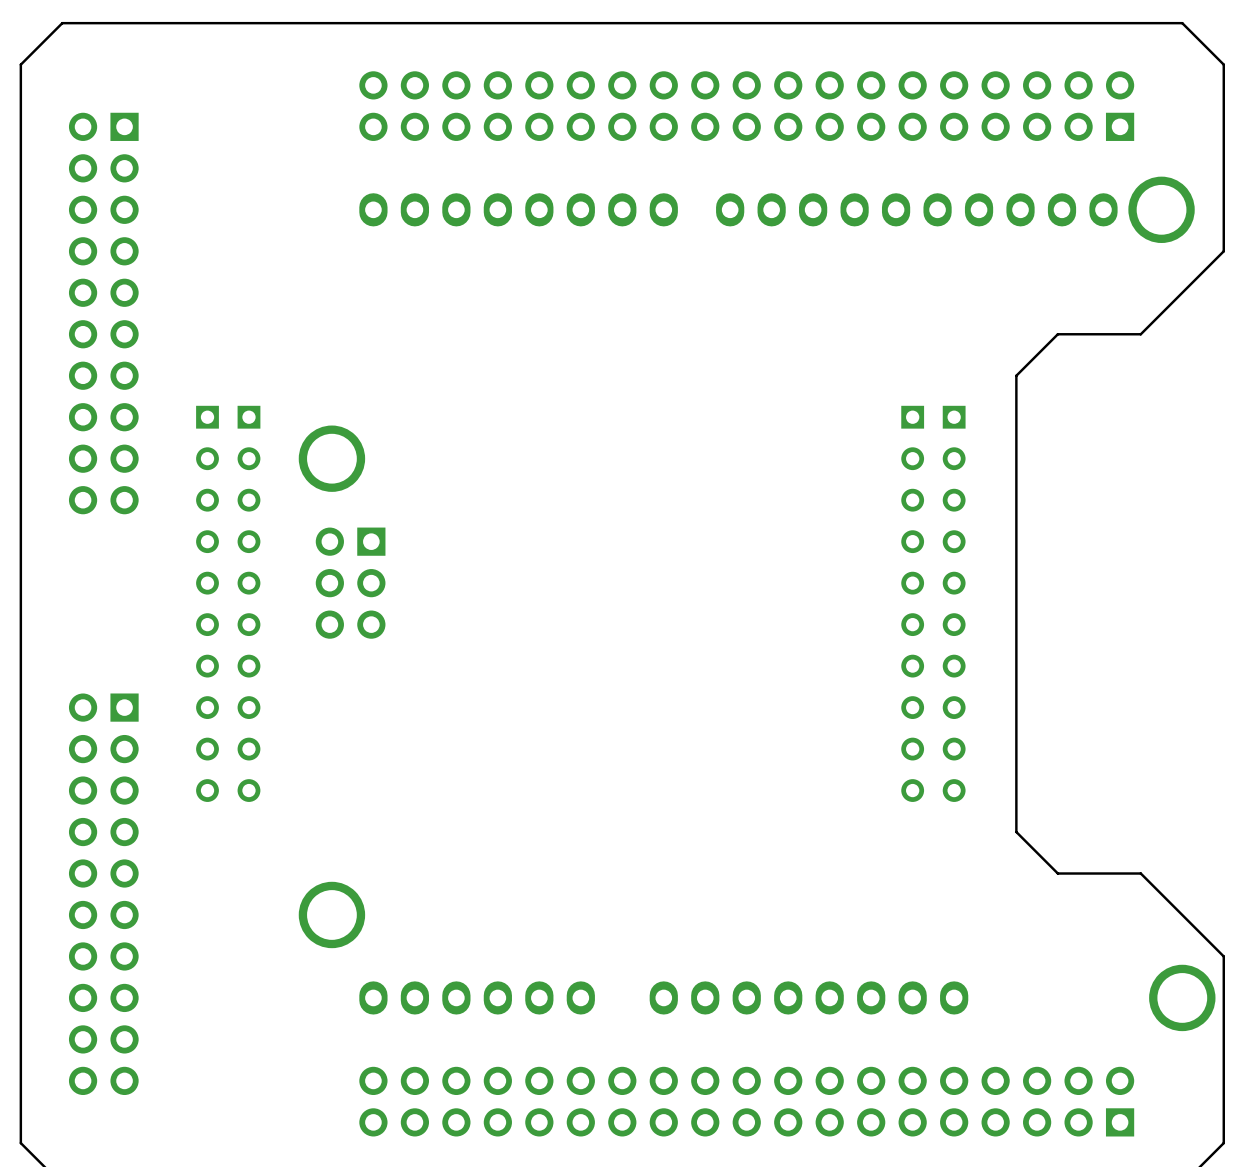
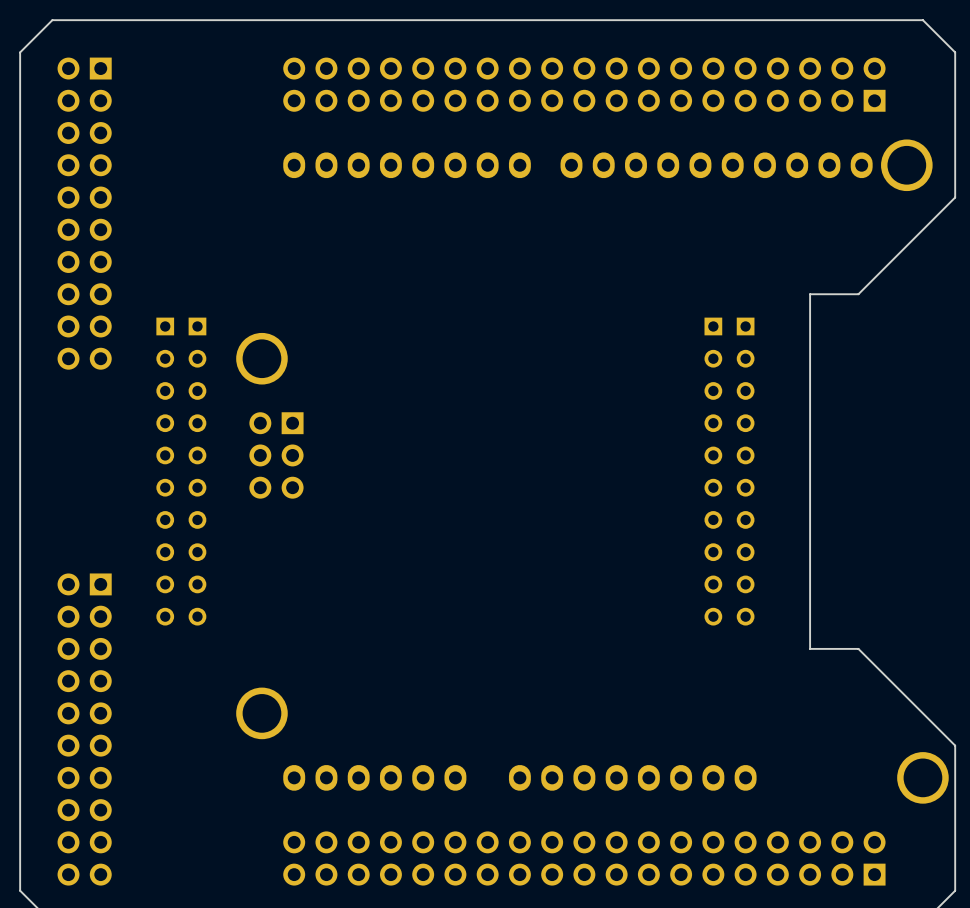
part position: (103, 313) -> (84, 213)
board edge: (1140, 334) (1057, 334) (1016, 375) (1016, 832) (1057, 873) (1140, 873) -> (890, 261) (858, 294) (810, 294) (810, 648) (858, 648) (890, 681)
part position: (103, 894) -> (84, 729)

